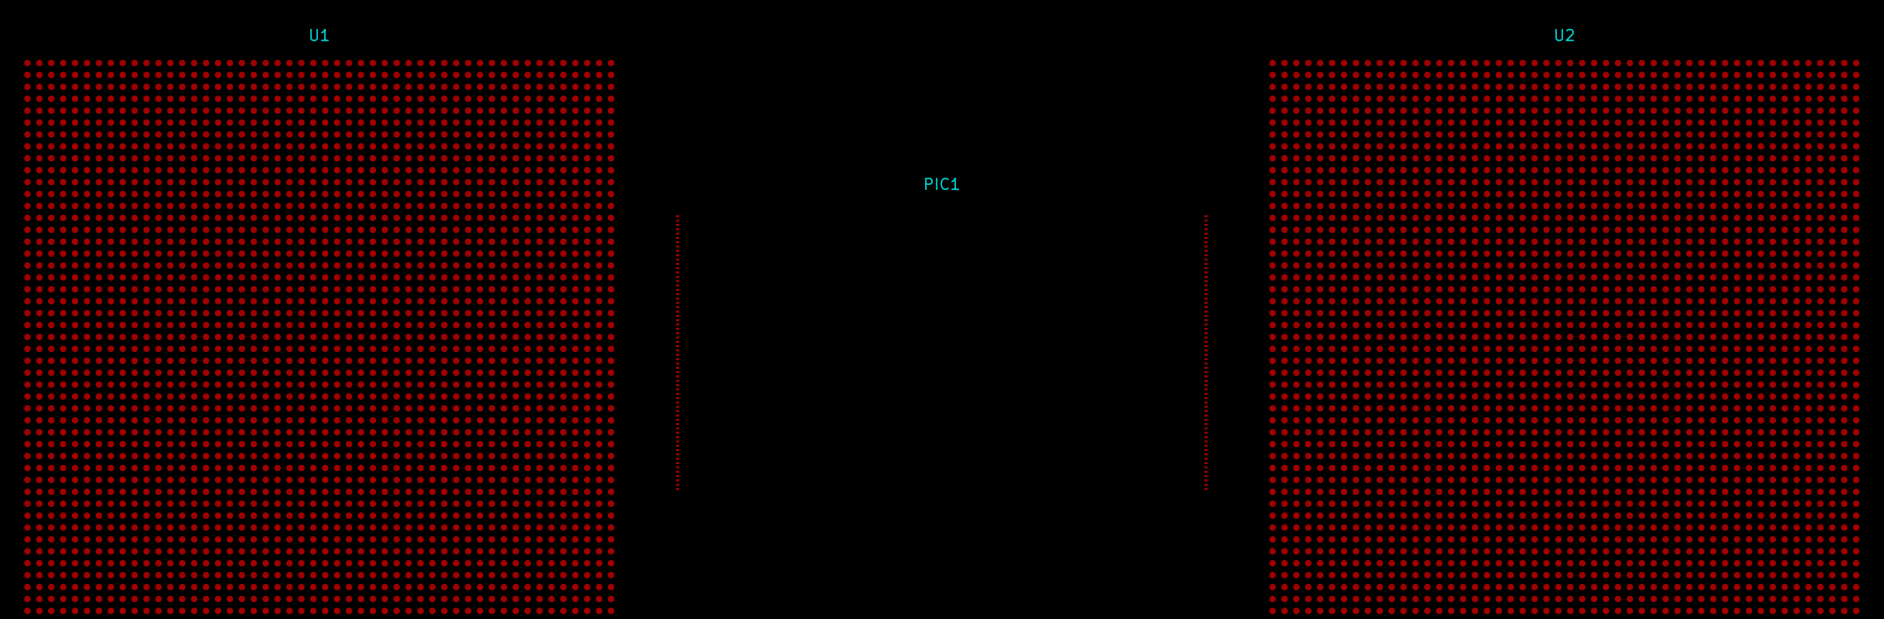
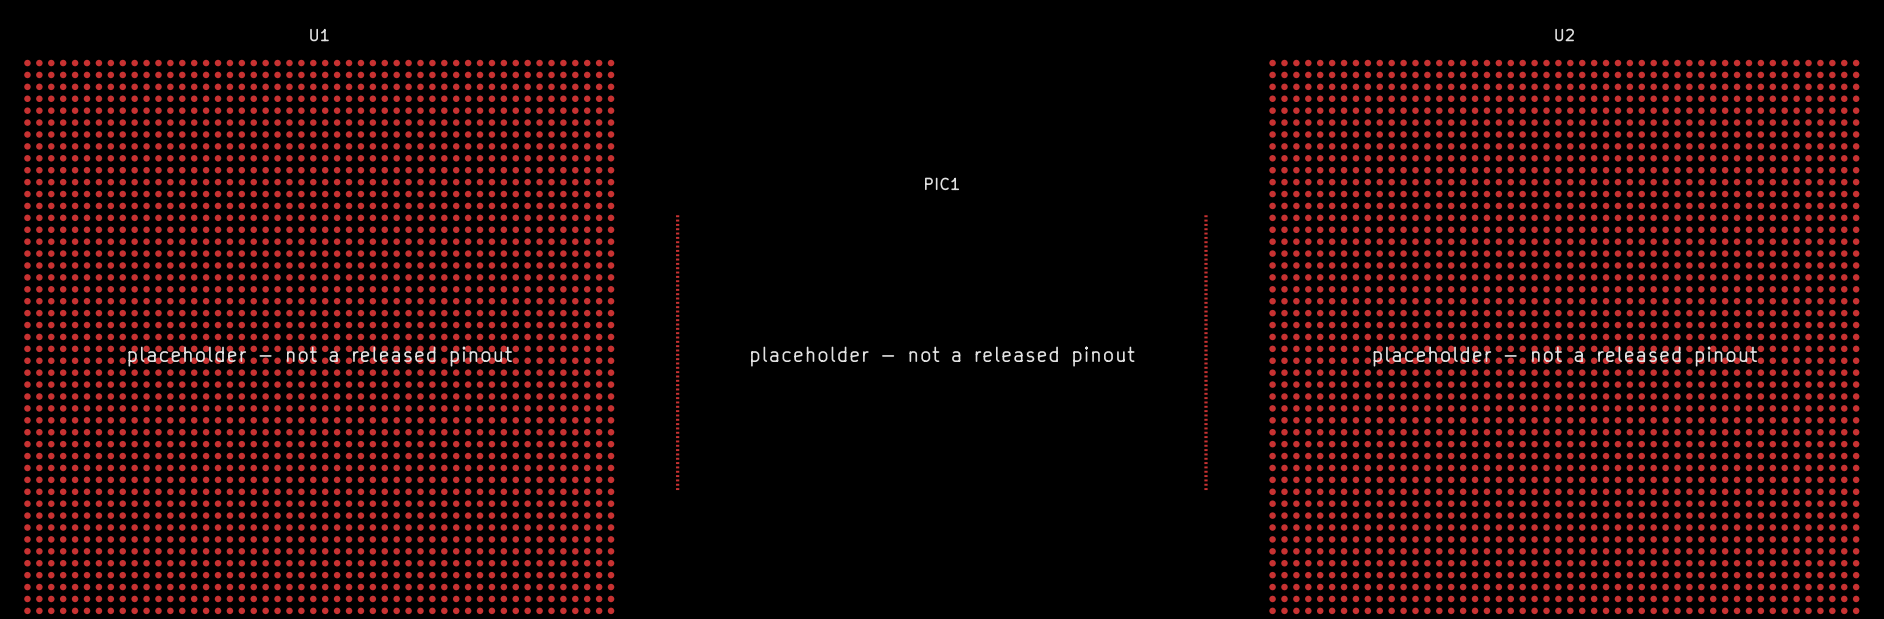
U1 text: none -> placeholder - not a released pinout (320, 356)
PIC1 text: none -> placeholder - not a released pinout (942, 356)
U2 text: none -> placeholder - not a released pinout (1565, 356)

